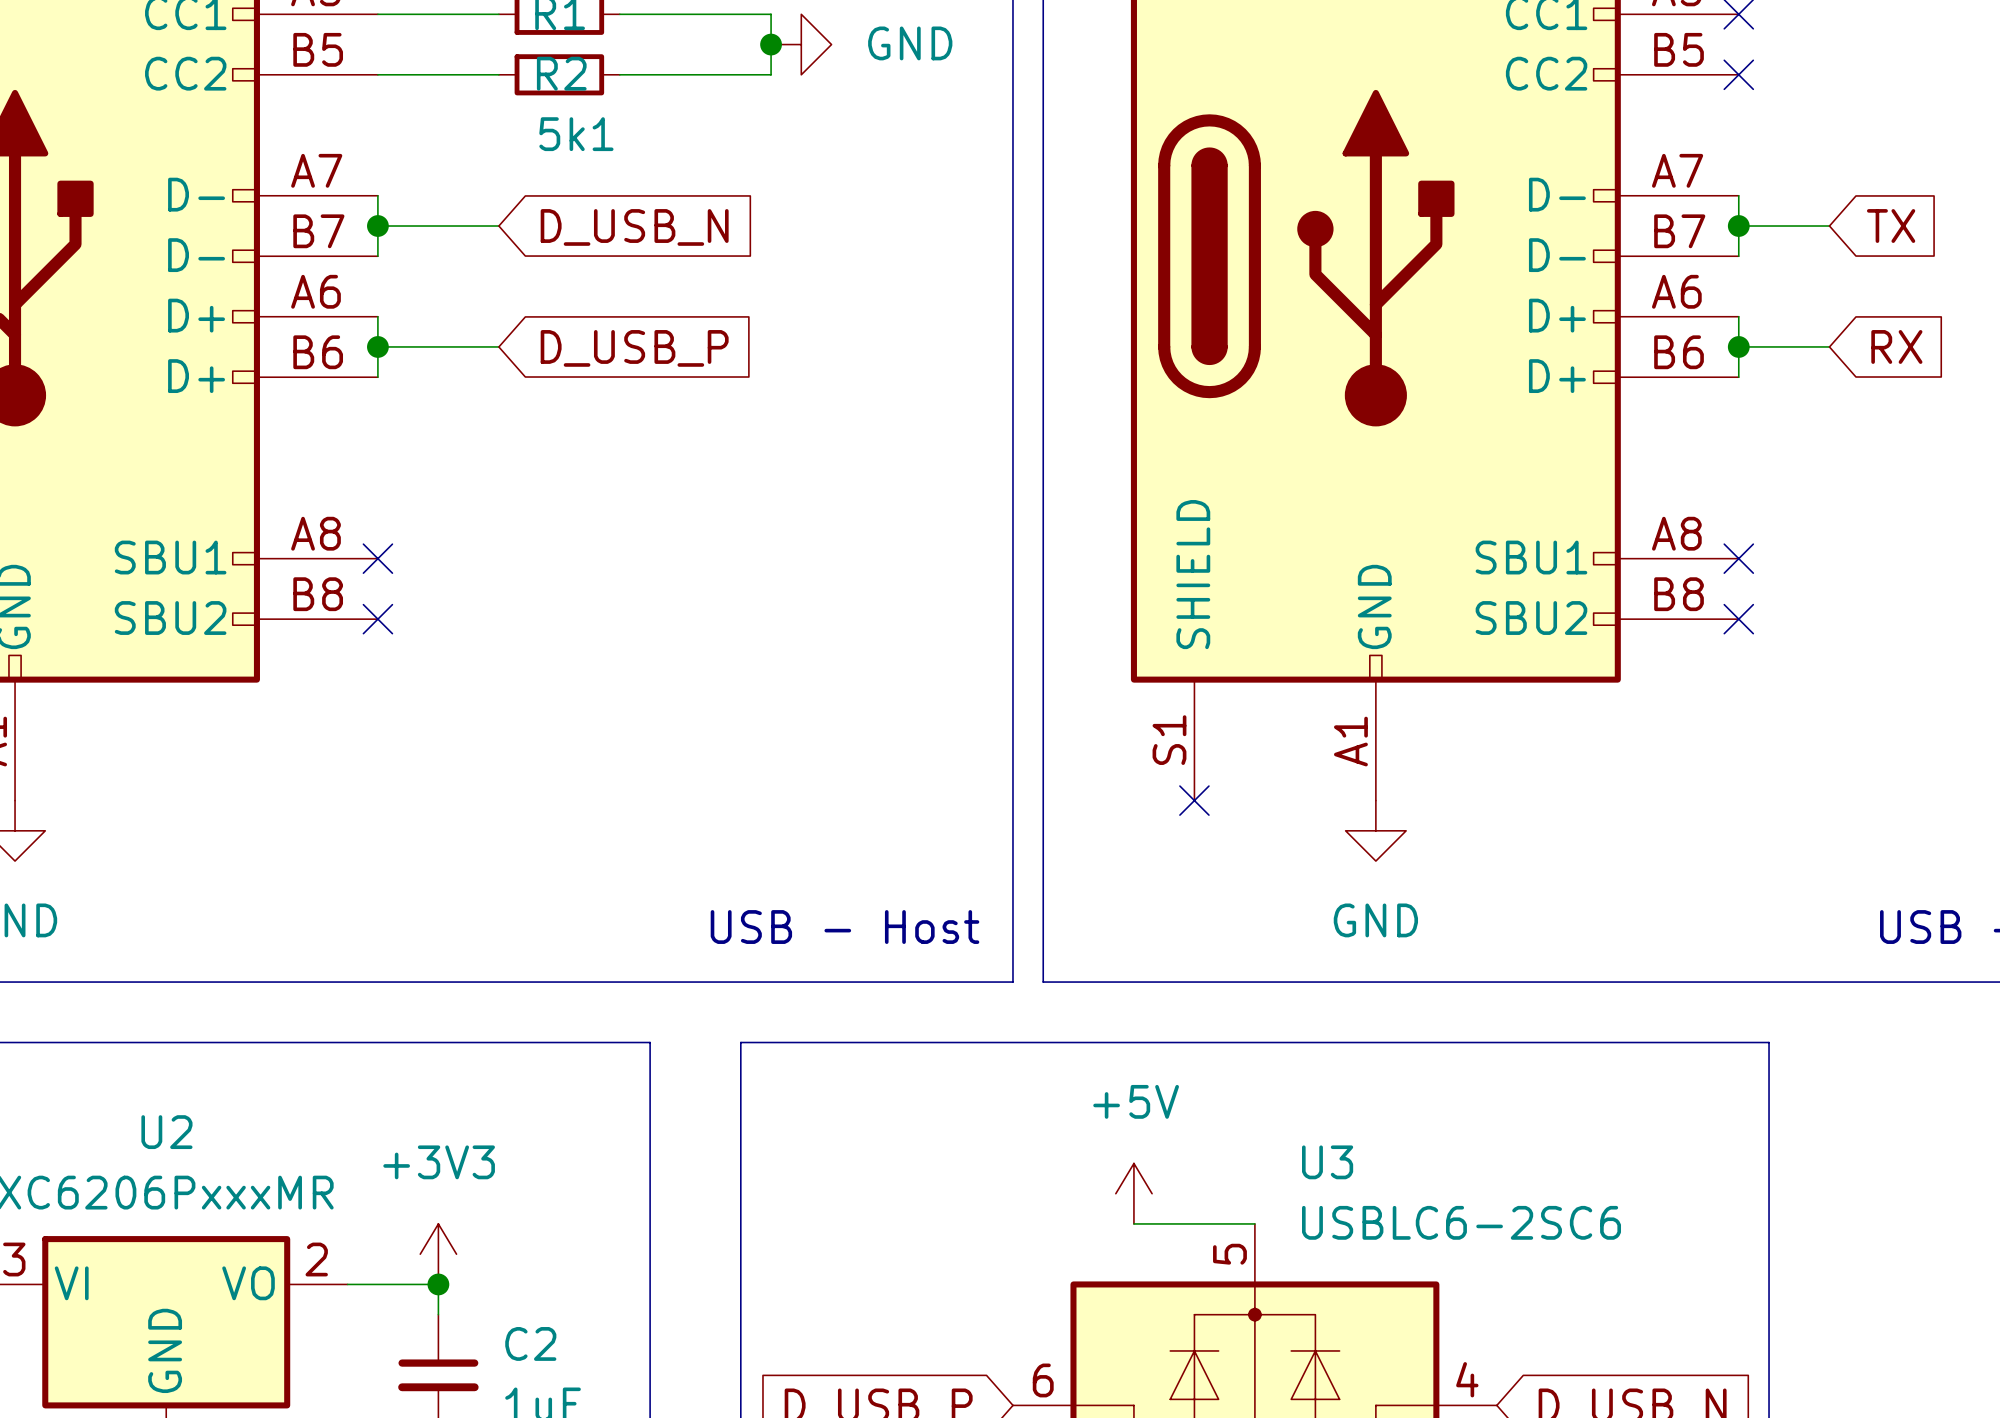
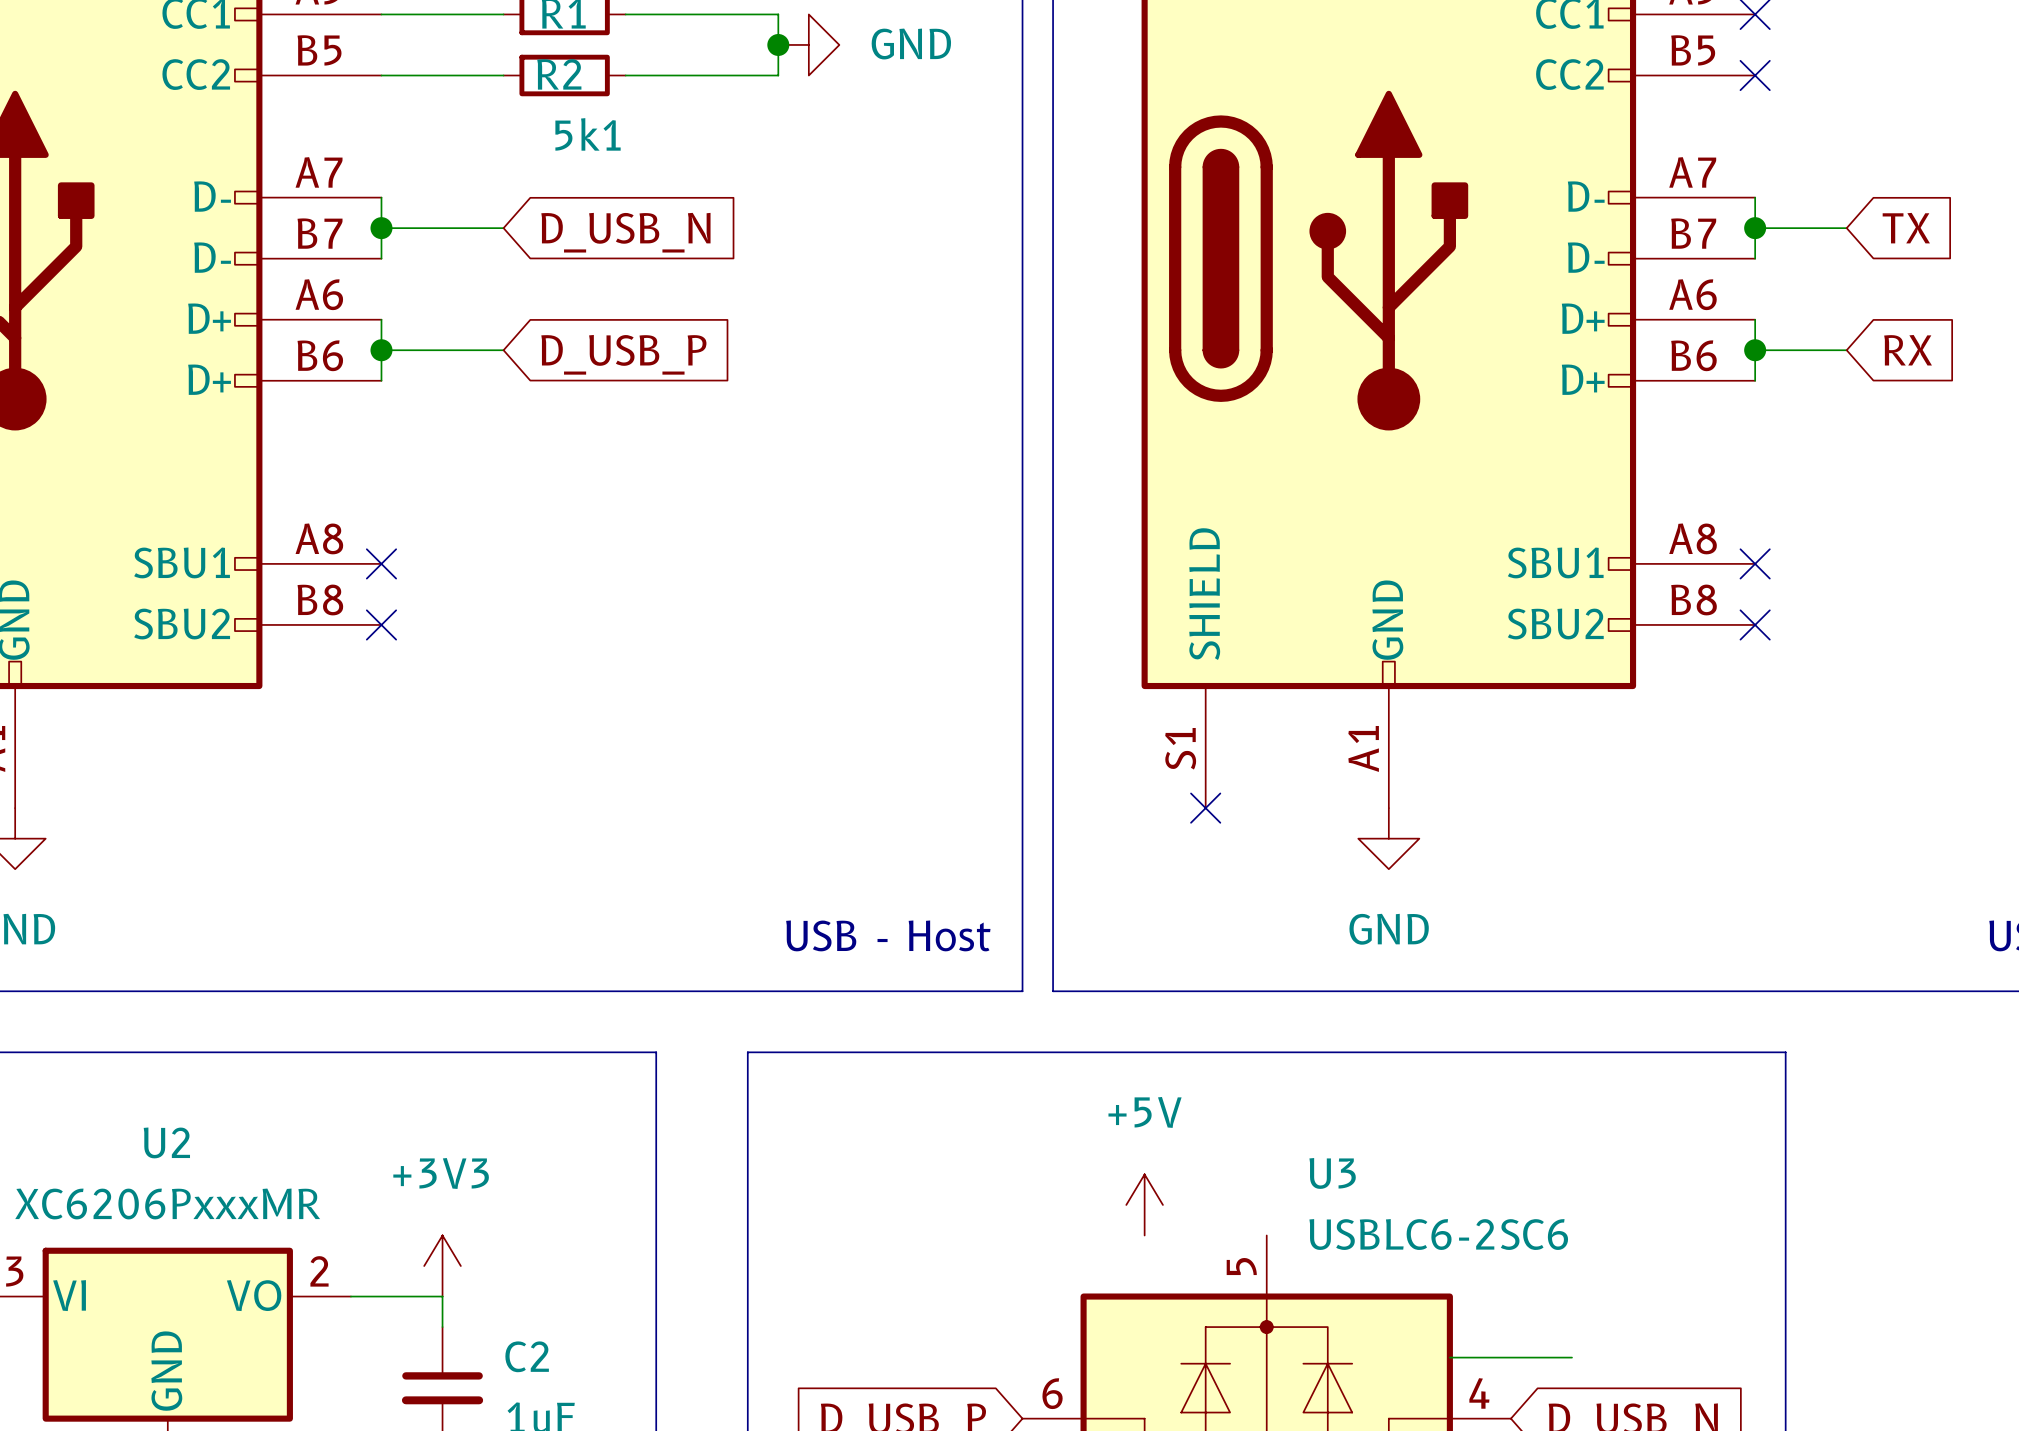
wire: (1133, 1223) (1254, 1223) -> (1449, 1357) (1571, 1357)
junction: (438, 1284) -> none

